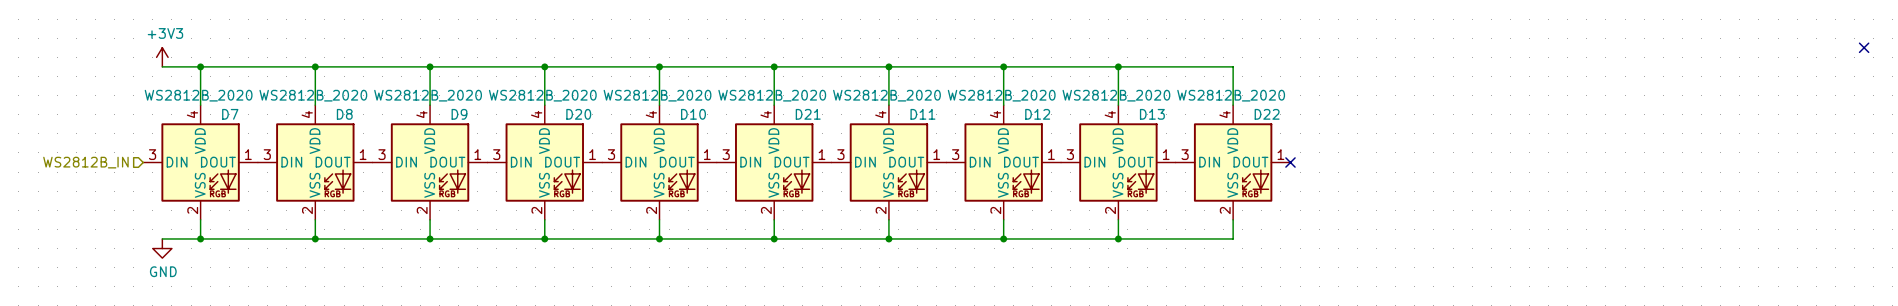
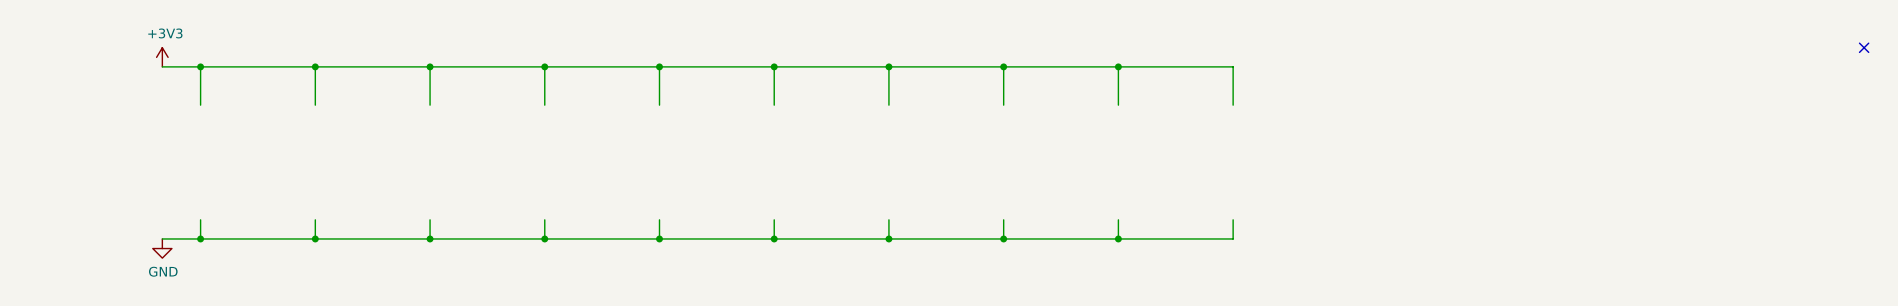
hierarchical label: WS2812B_IN (85, 162) -> none
D7: WS2812B_2020 (200, 162) -> none
D8: WS2812B_2020 (315, 162) -> none
D9: WS2812B_2020 (430, 162) -> none
D20: WS2812B_2020 (544, 162) -> none
D10: WS2812B_2020 (659, 162) -> none
D21: WS2812B_2020 (774, 162) -> none
D11: WS2812B_2020 (888, 162) -> none
D12: WS2812B_2020 (1003, 162) -> none
D13: WS2812B_2020 (1118, 162) -> none
D22: WS2812B_2020 (1233, 162) -> none
no-connect mark: (1290, 162) -> none

